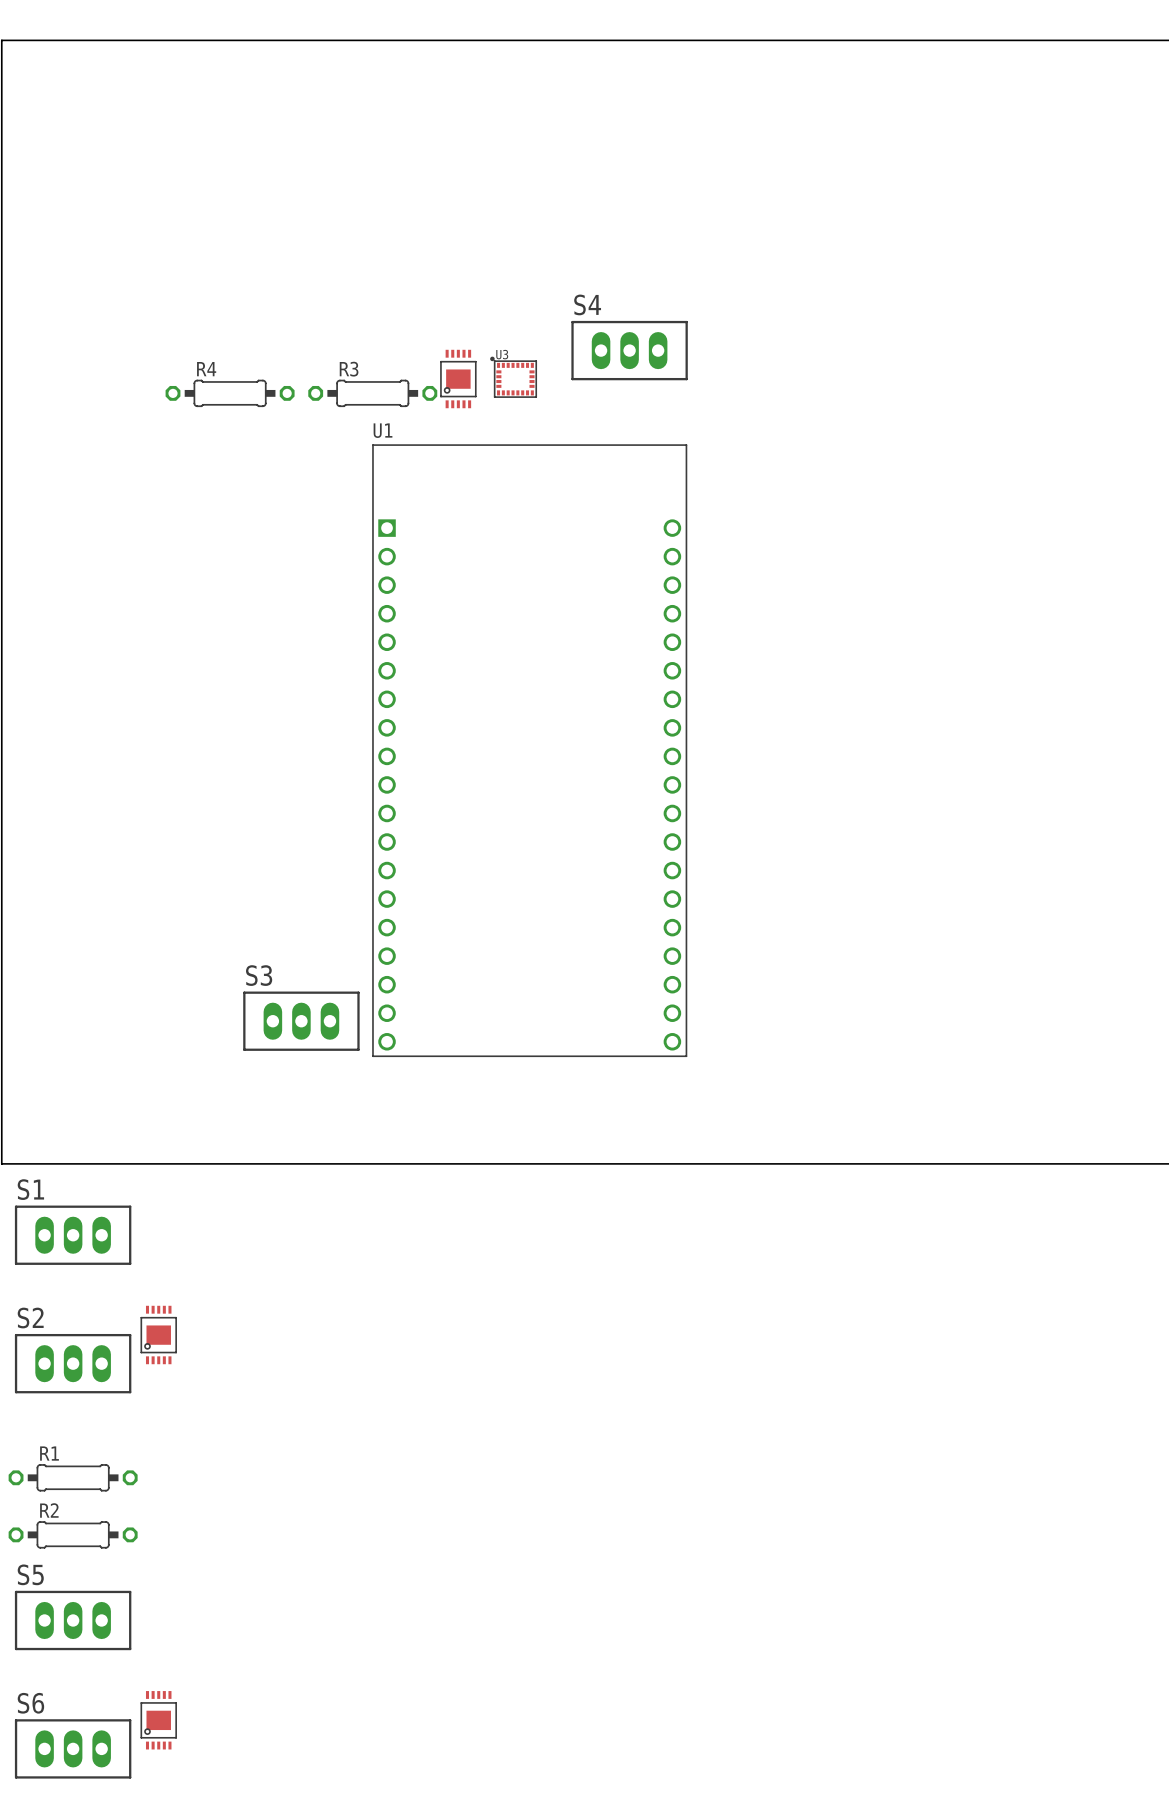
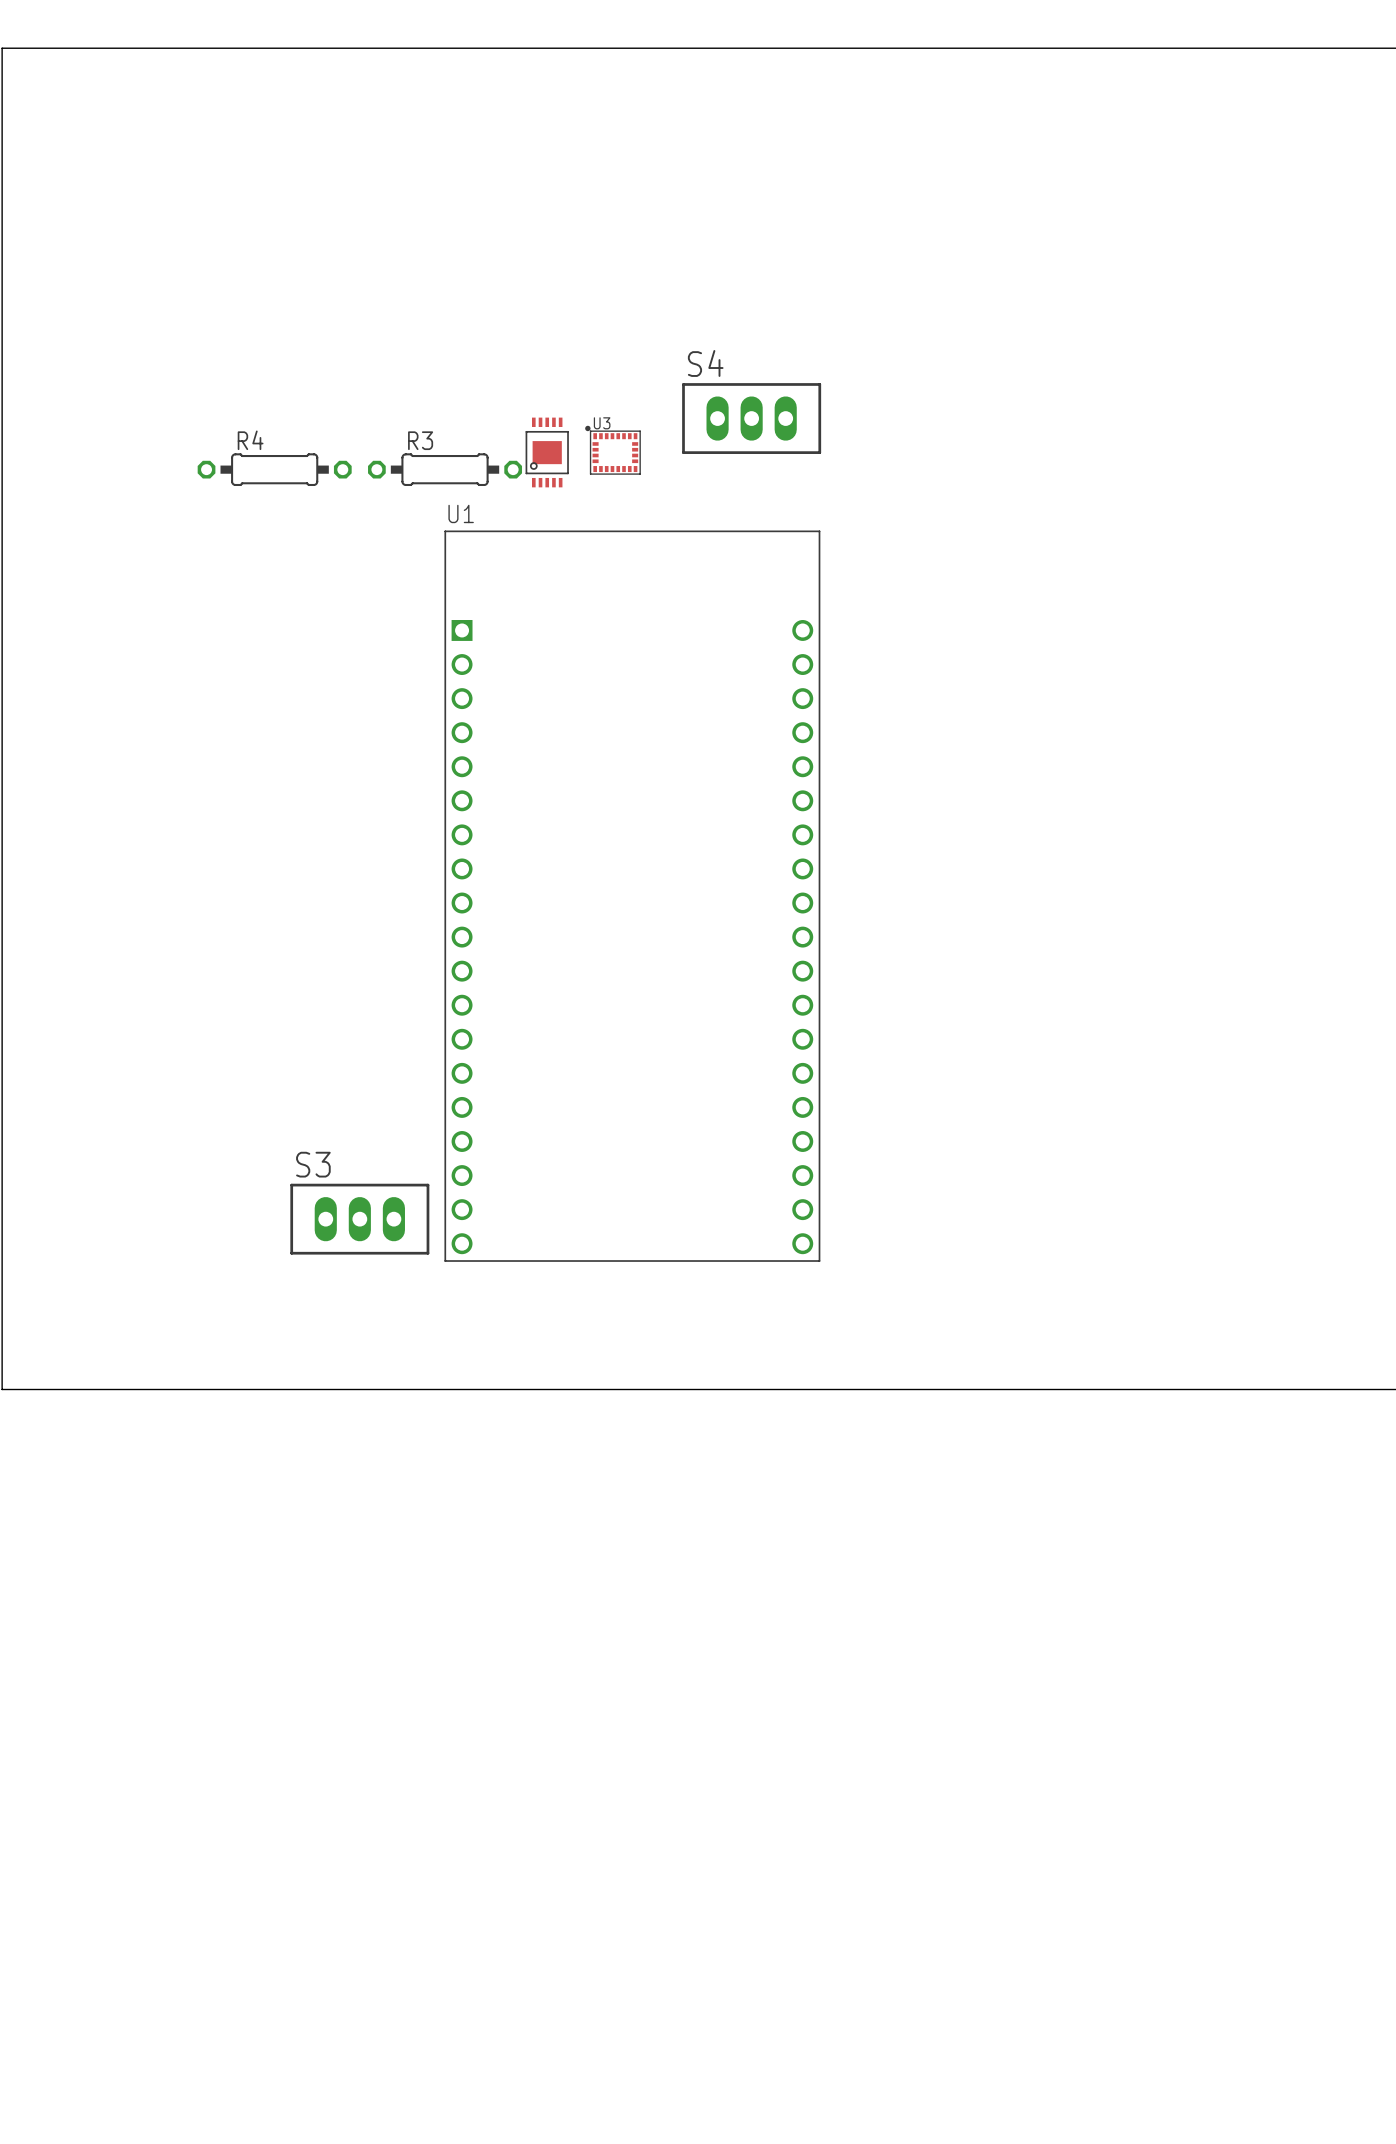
S1: (73, 1235) -> none
part: (158, 1335) -> none
S2: (73, 1363) -> none
R1: (73, 1477) -> none
R2: (73, 1534) -> none
S5: (73, 1620) -> none
part: (158, 1720) -> none
S6: (73, 1748) -> none

